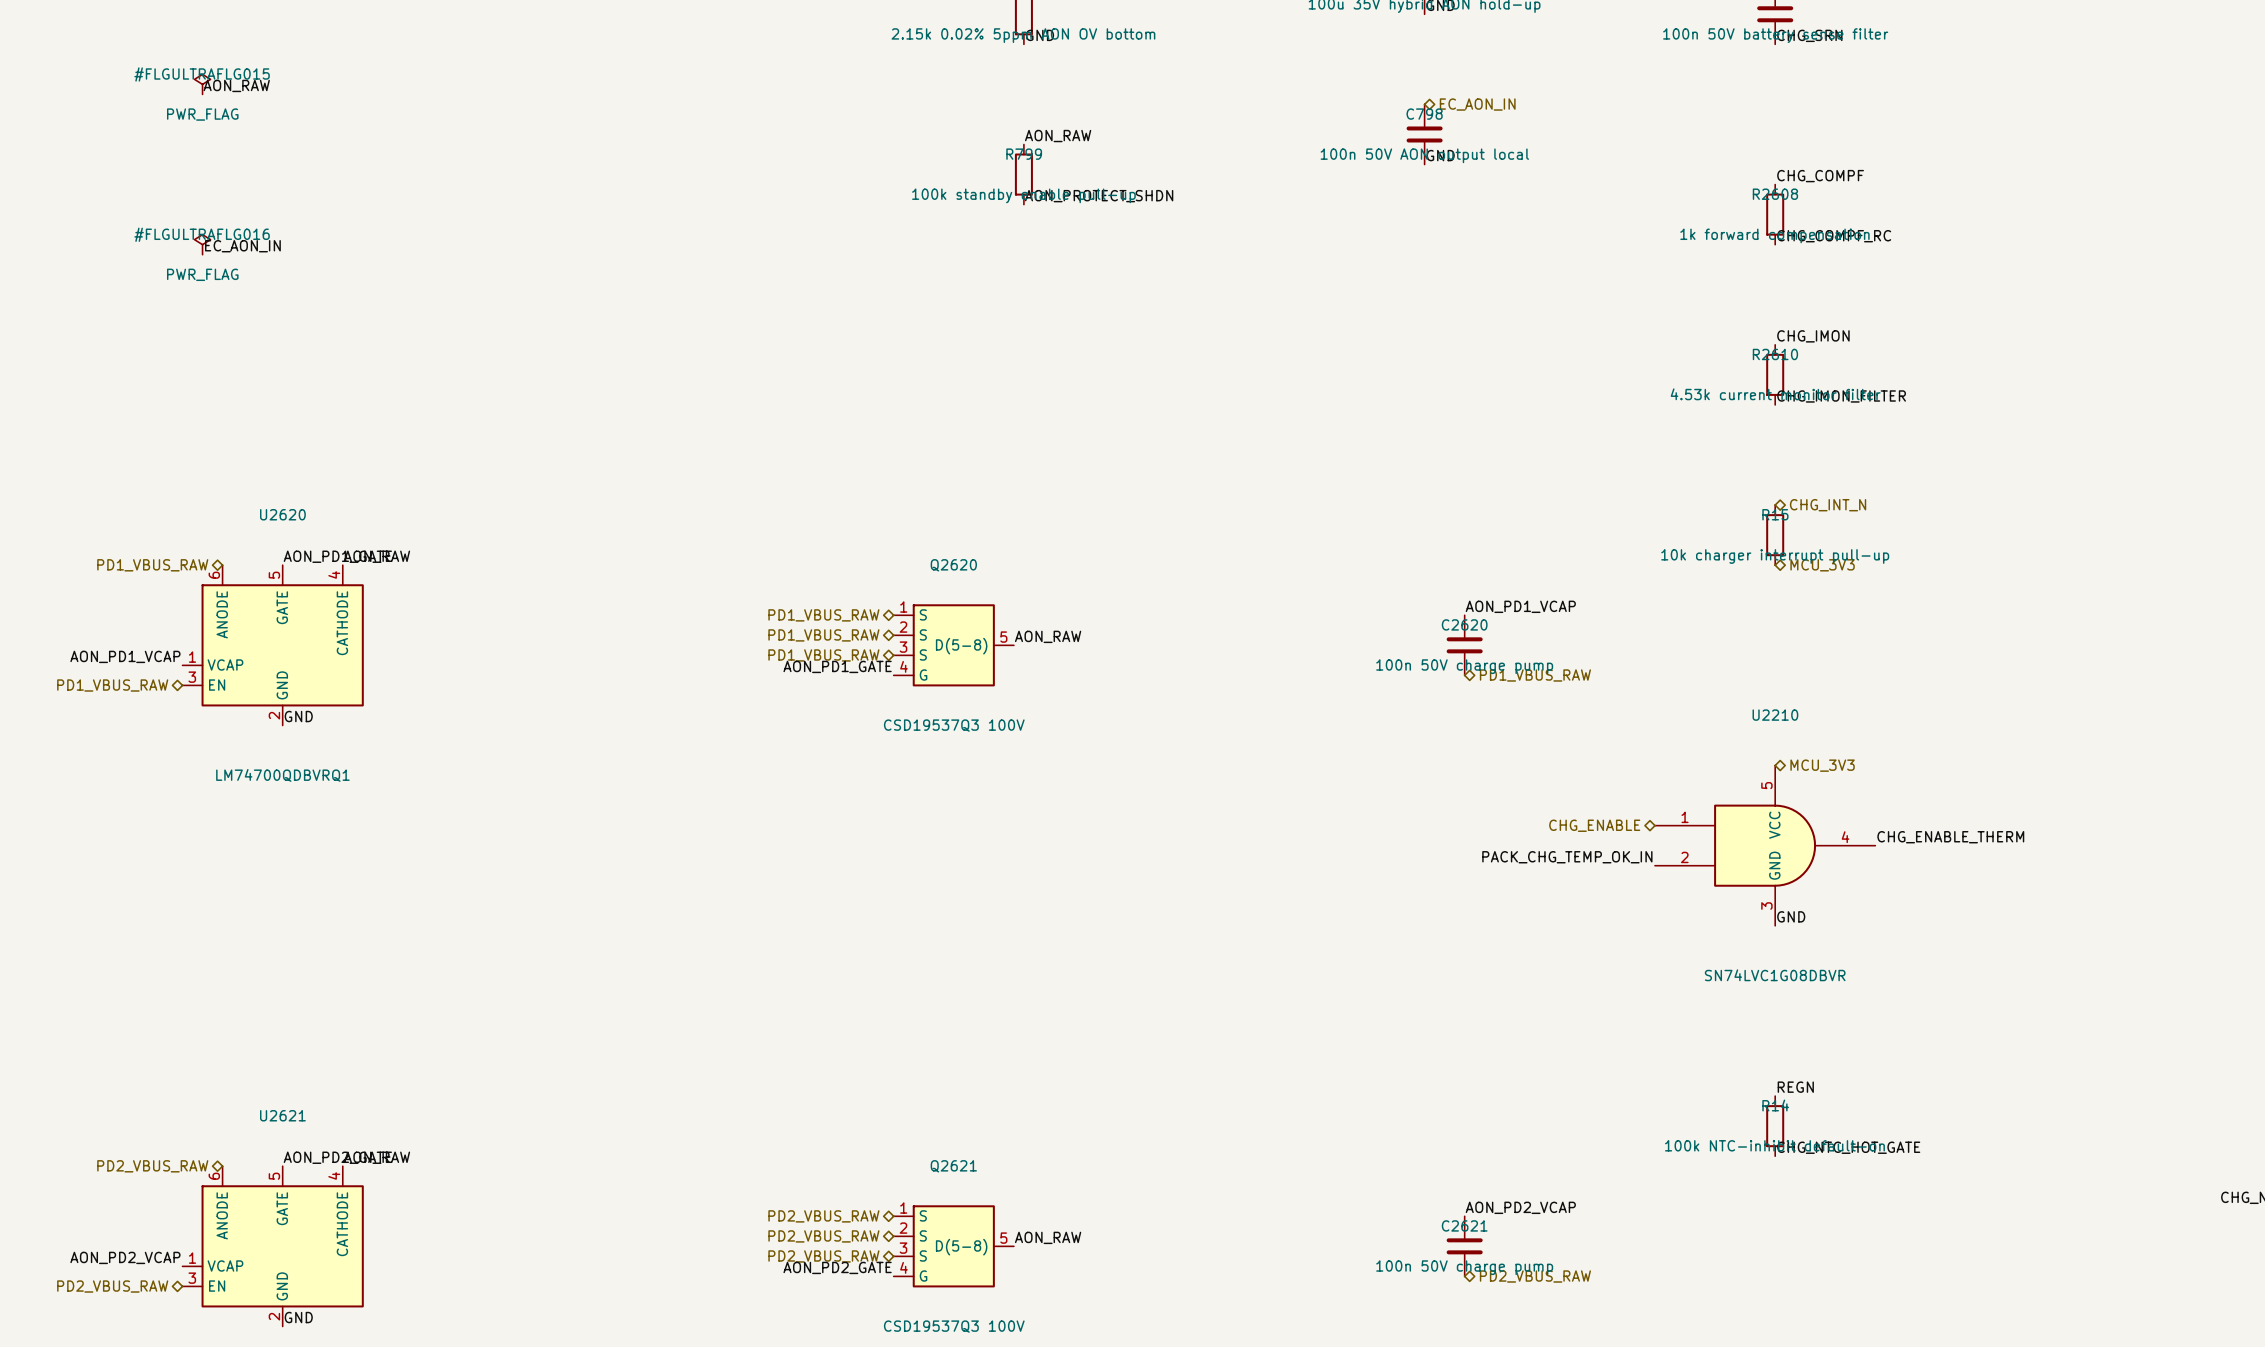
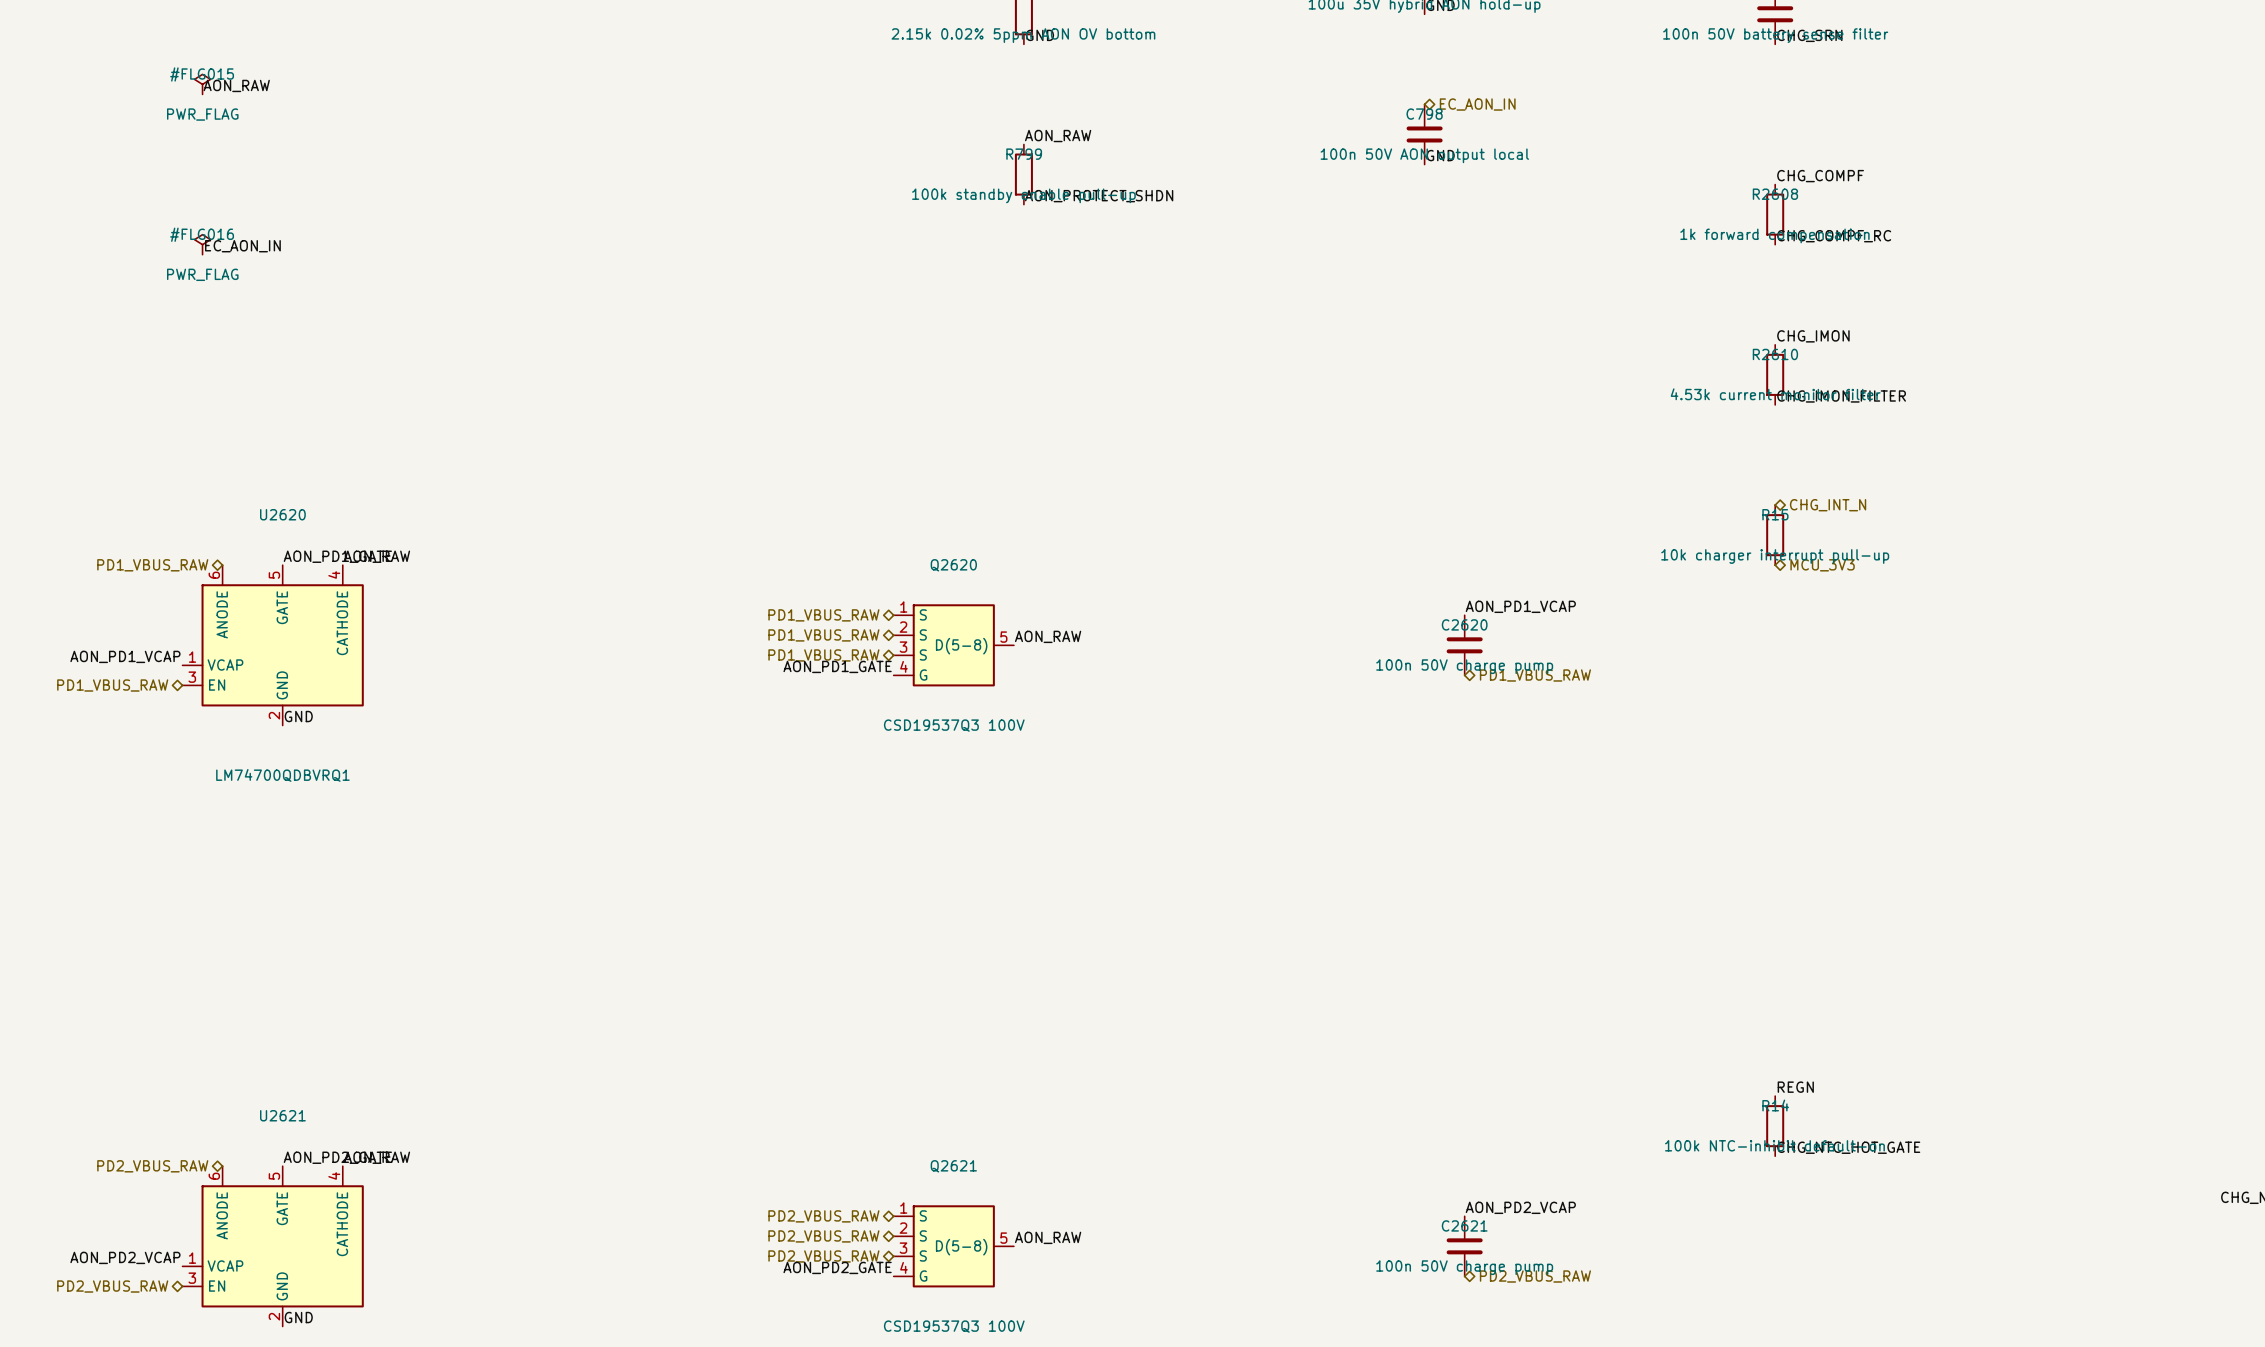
#FLGULTRAFLG015 name: #FLGULTRAFLG015 (202, 74) -> #FLG015 (202, 74)
#FLGULTRAFLG016 name: #FLGULTRAFLG016 (202, 234) -> #FLG016 (202, 234)
hierarchical label: MCU_3V3 (1822, 765) -> none
hierarchical label: CHG_ENABLE (1594, 825) -> none
label: CHG_ENABLE_THERM (1950, 837) -> none
U2210: SN74LVC1G08DBVR (1765, 845) -> none
label: PACK_CHG_TEMP_OK_IN (1567, 857) -> none
label: GND (1791, 916) -> none

